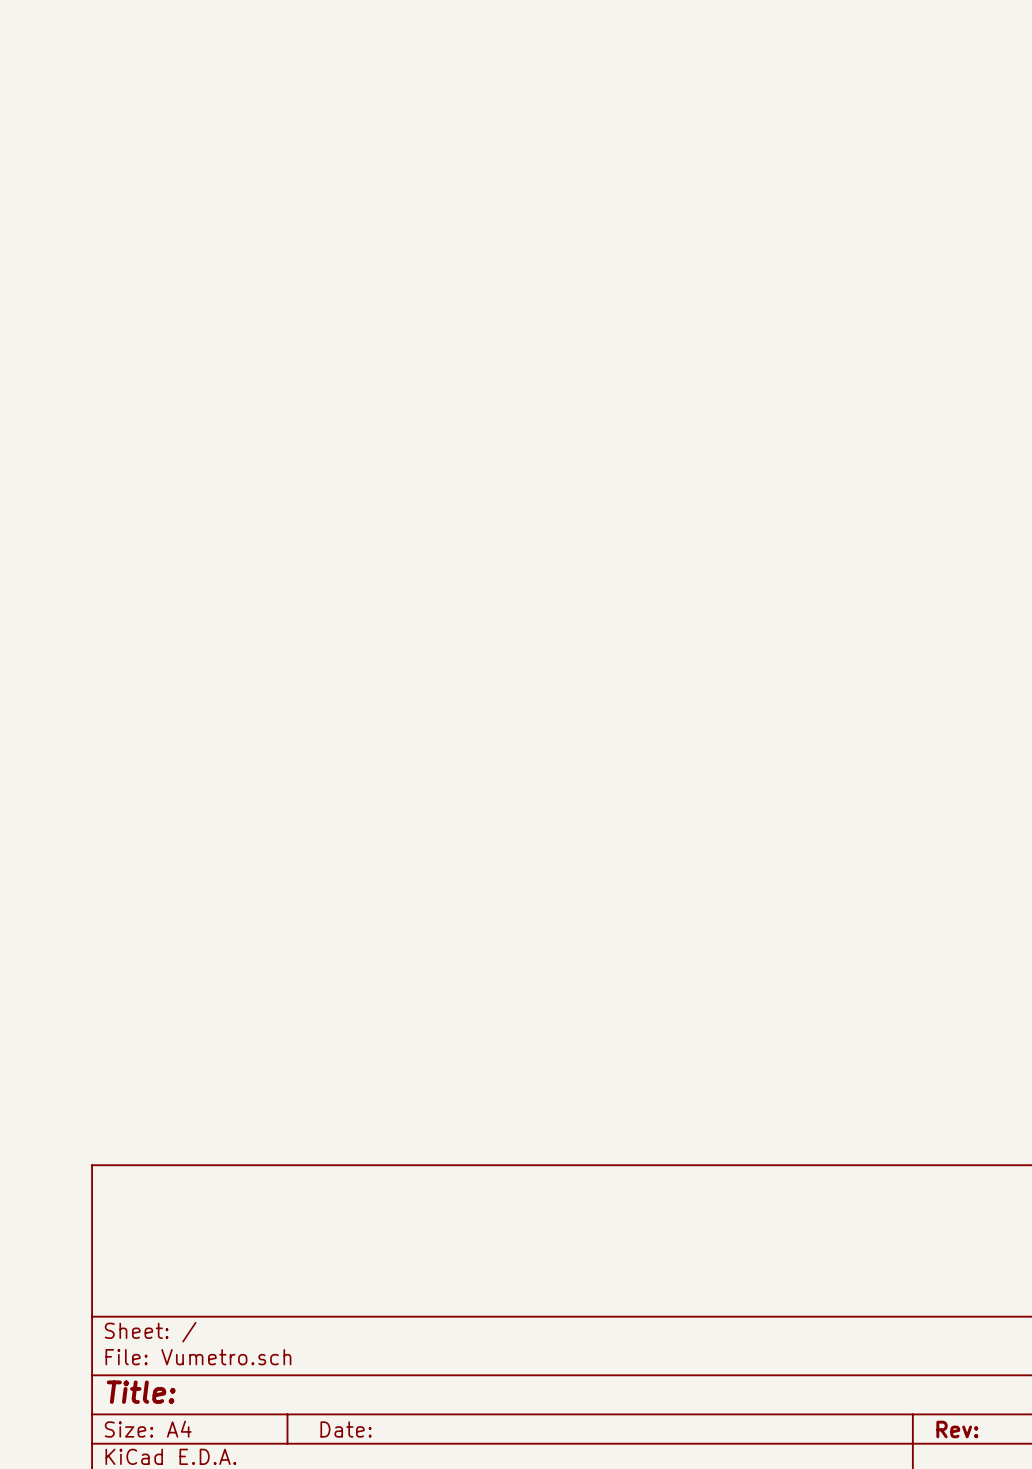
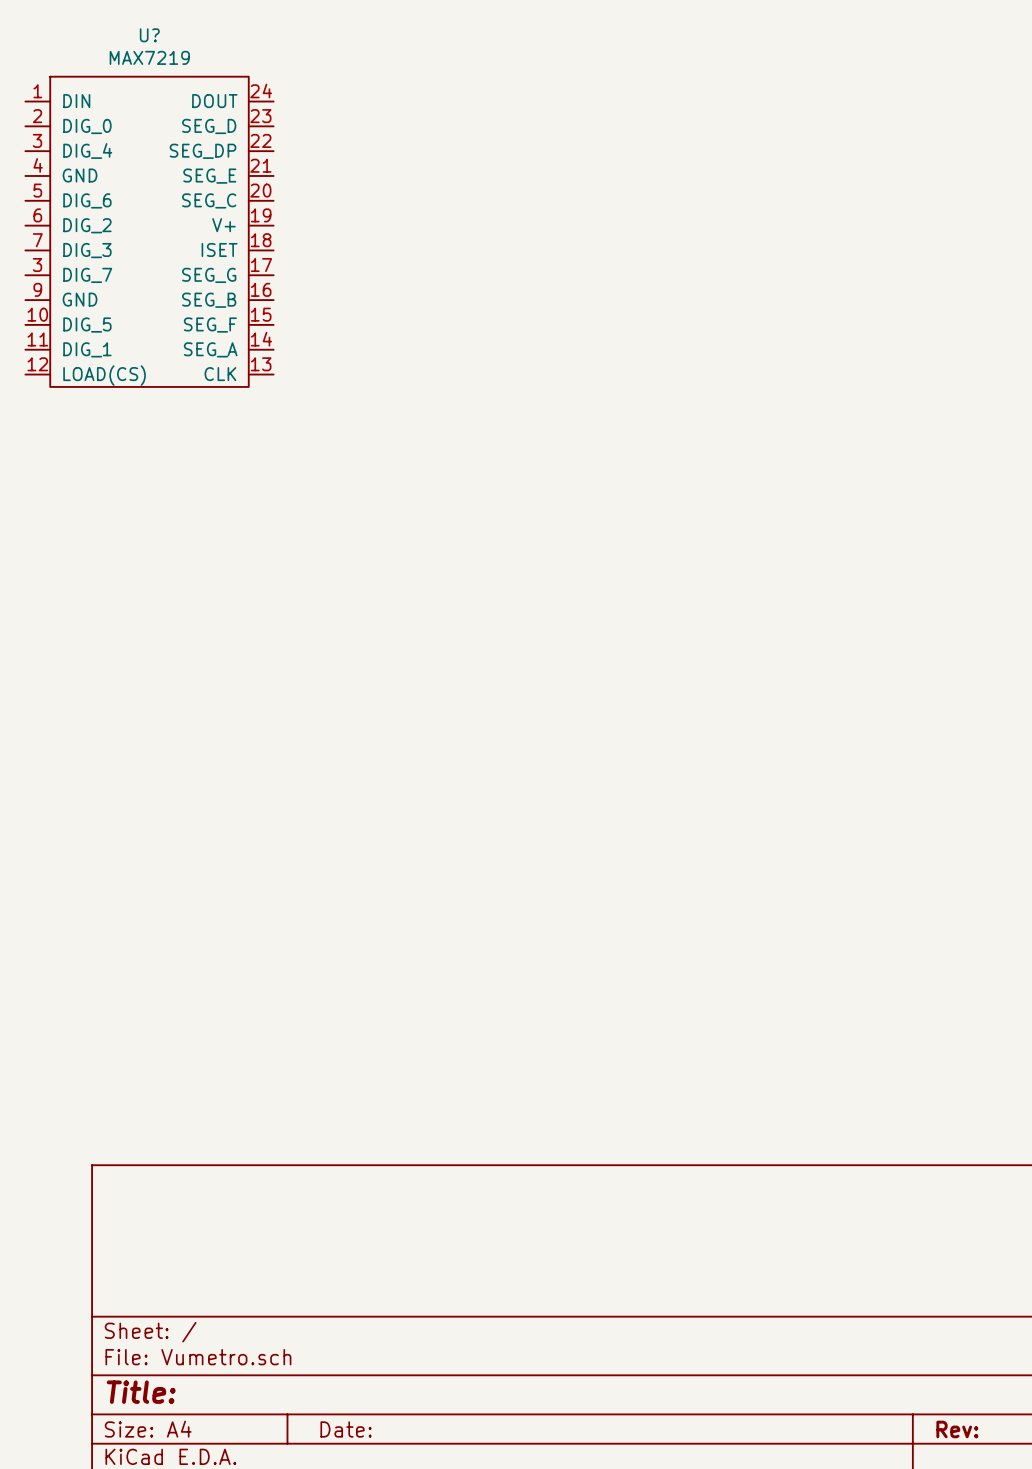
U?: none -> MAX7219 (149, 231)

